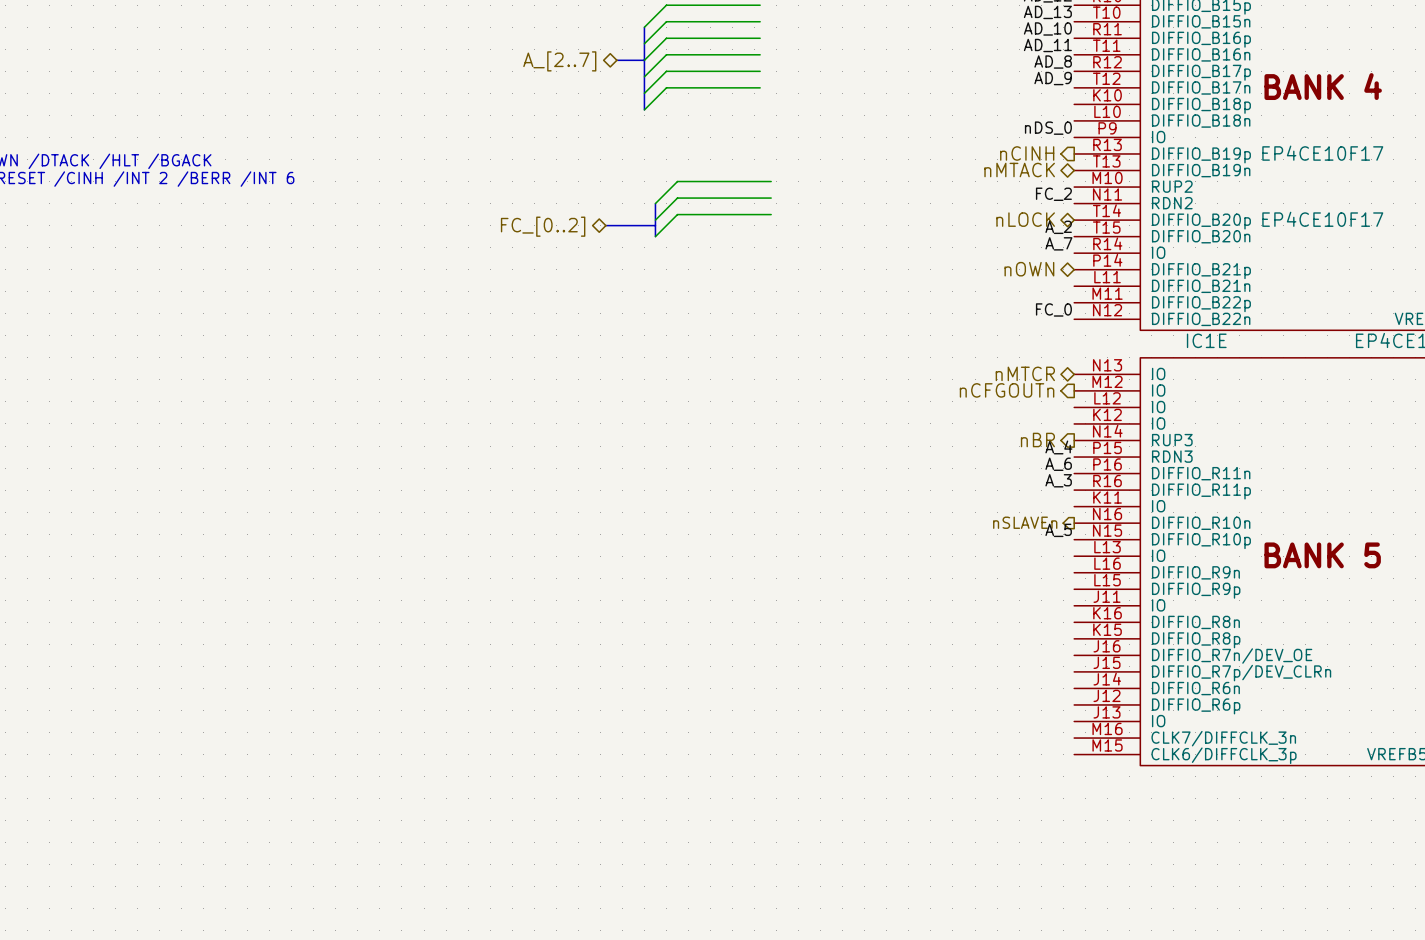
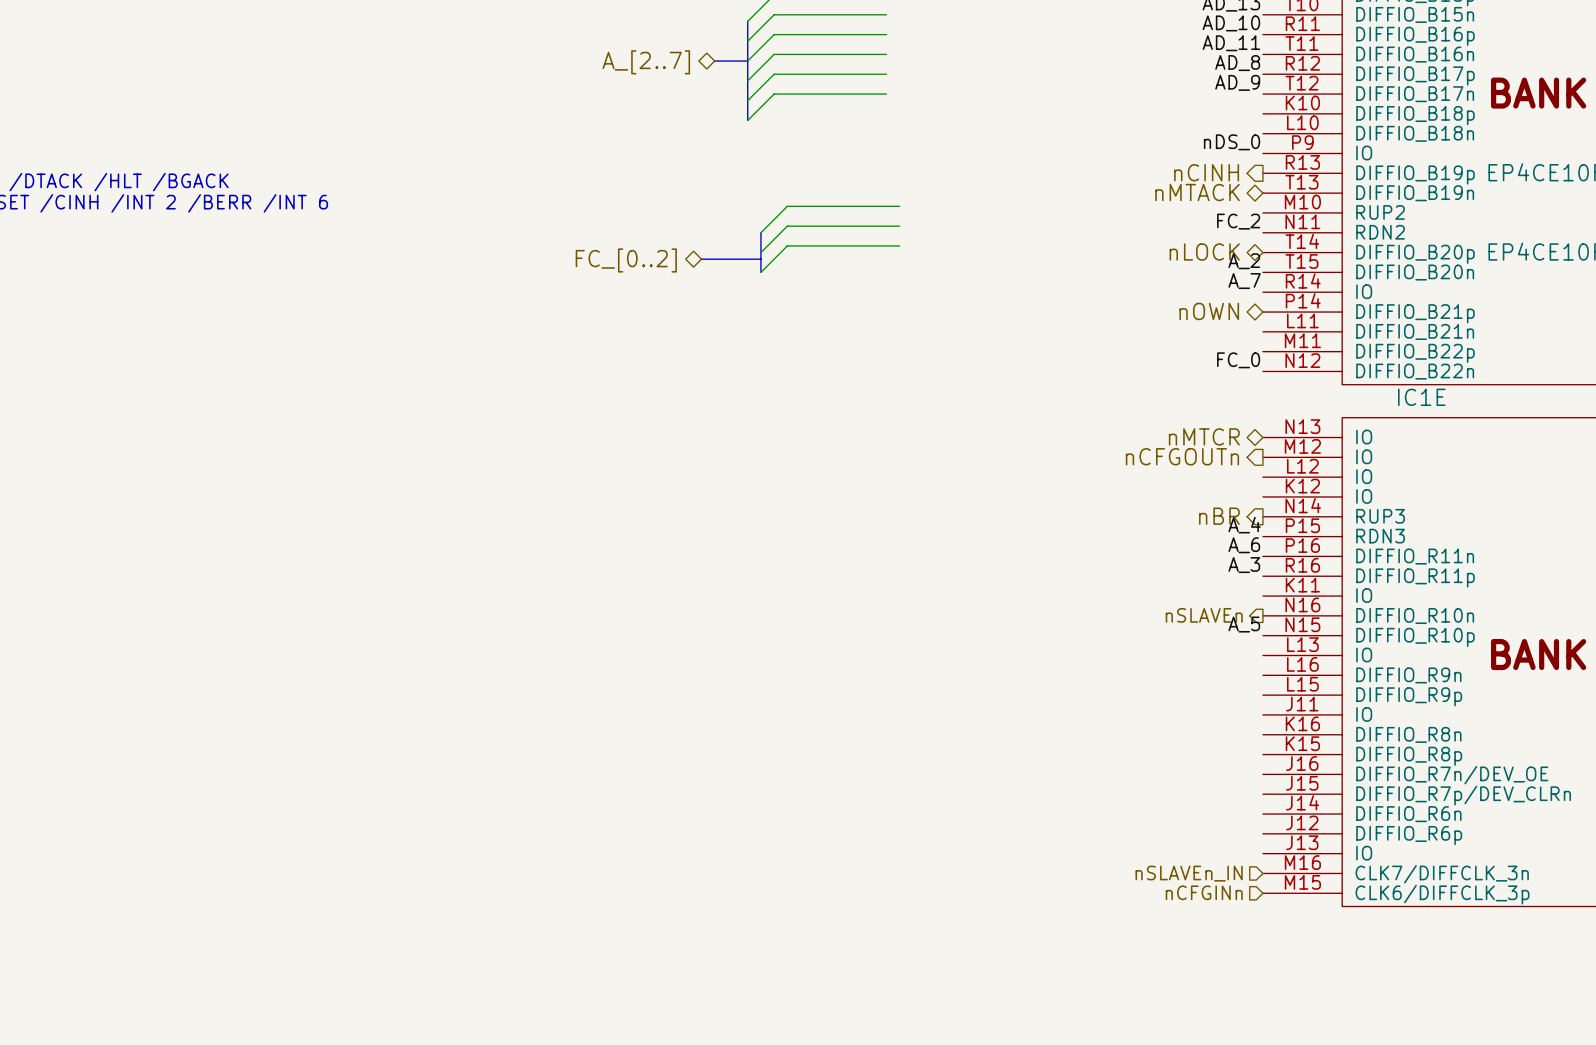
hierarchical label: none -> nSLAVEn_IN (1189, 873)
hierarchical label: none -> nCFGINn (1204, 892)

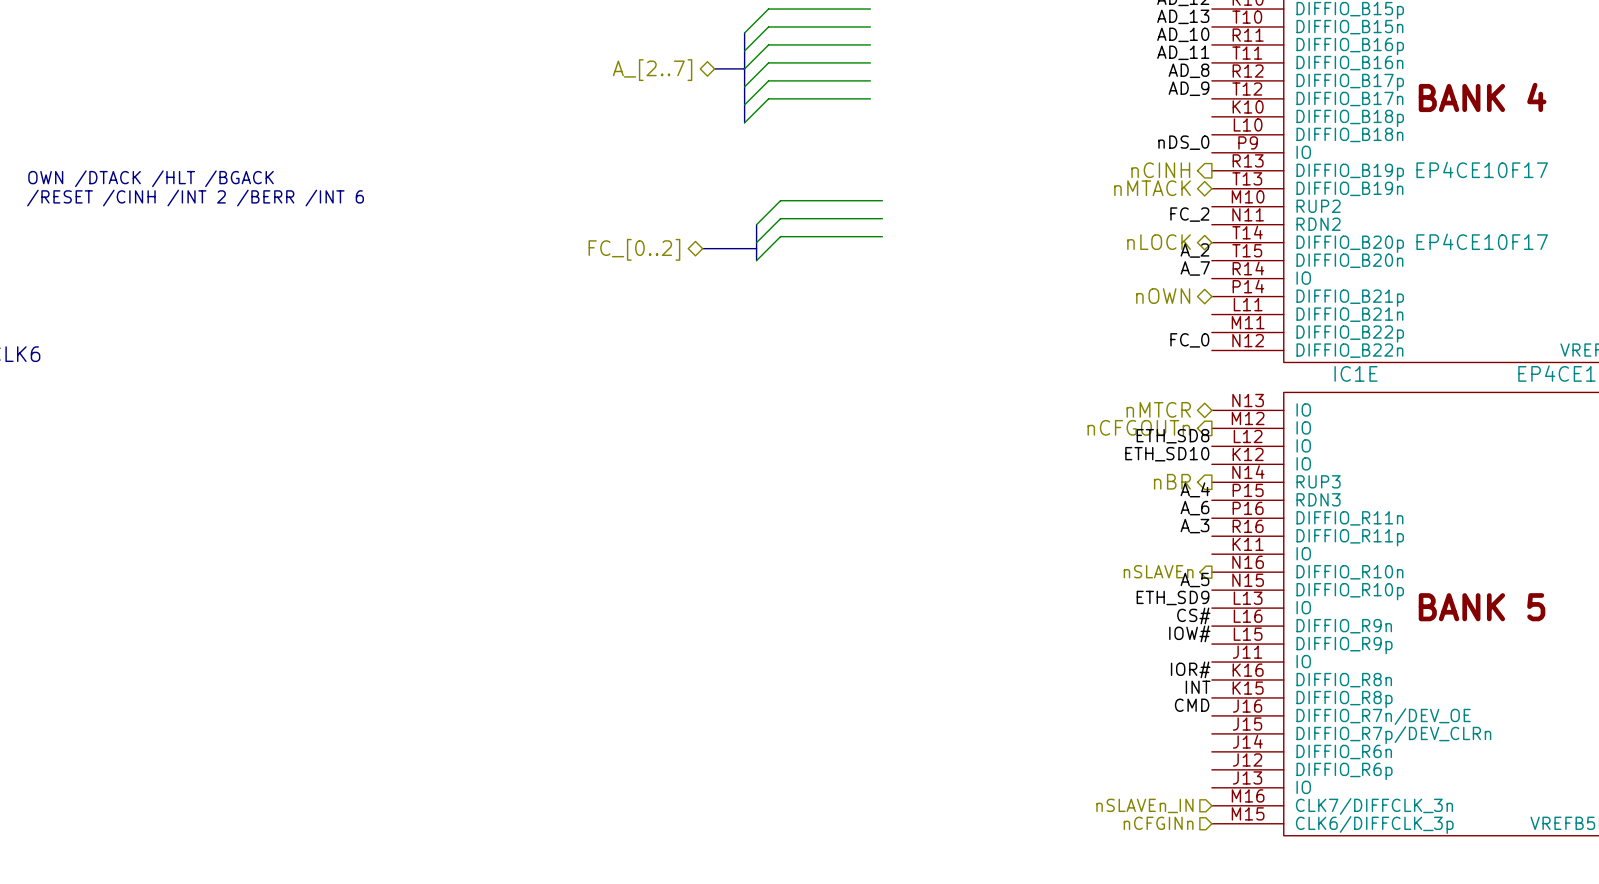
label: none -> ETH_SD8 (1172, 436)
label: none -> ETH_SD10 (1167, 454)
label: none -> ETH_SD9 (1172, 597)
label: none -> CS# (1193, 615)
label: none -> IOW# (1189, 633)
label: none -> IOR# (1190, 669)
label: none -> INT (1198, 687)
label: none -> CMD (1192, 705)

